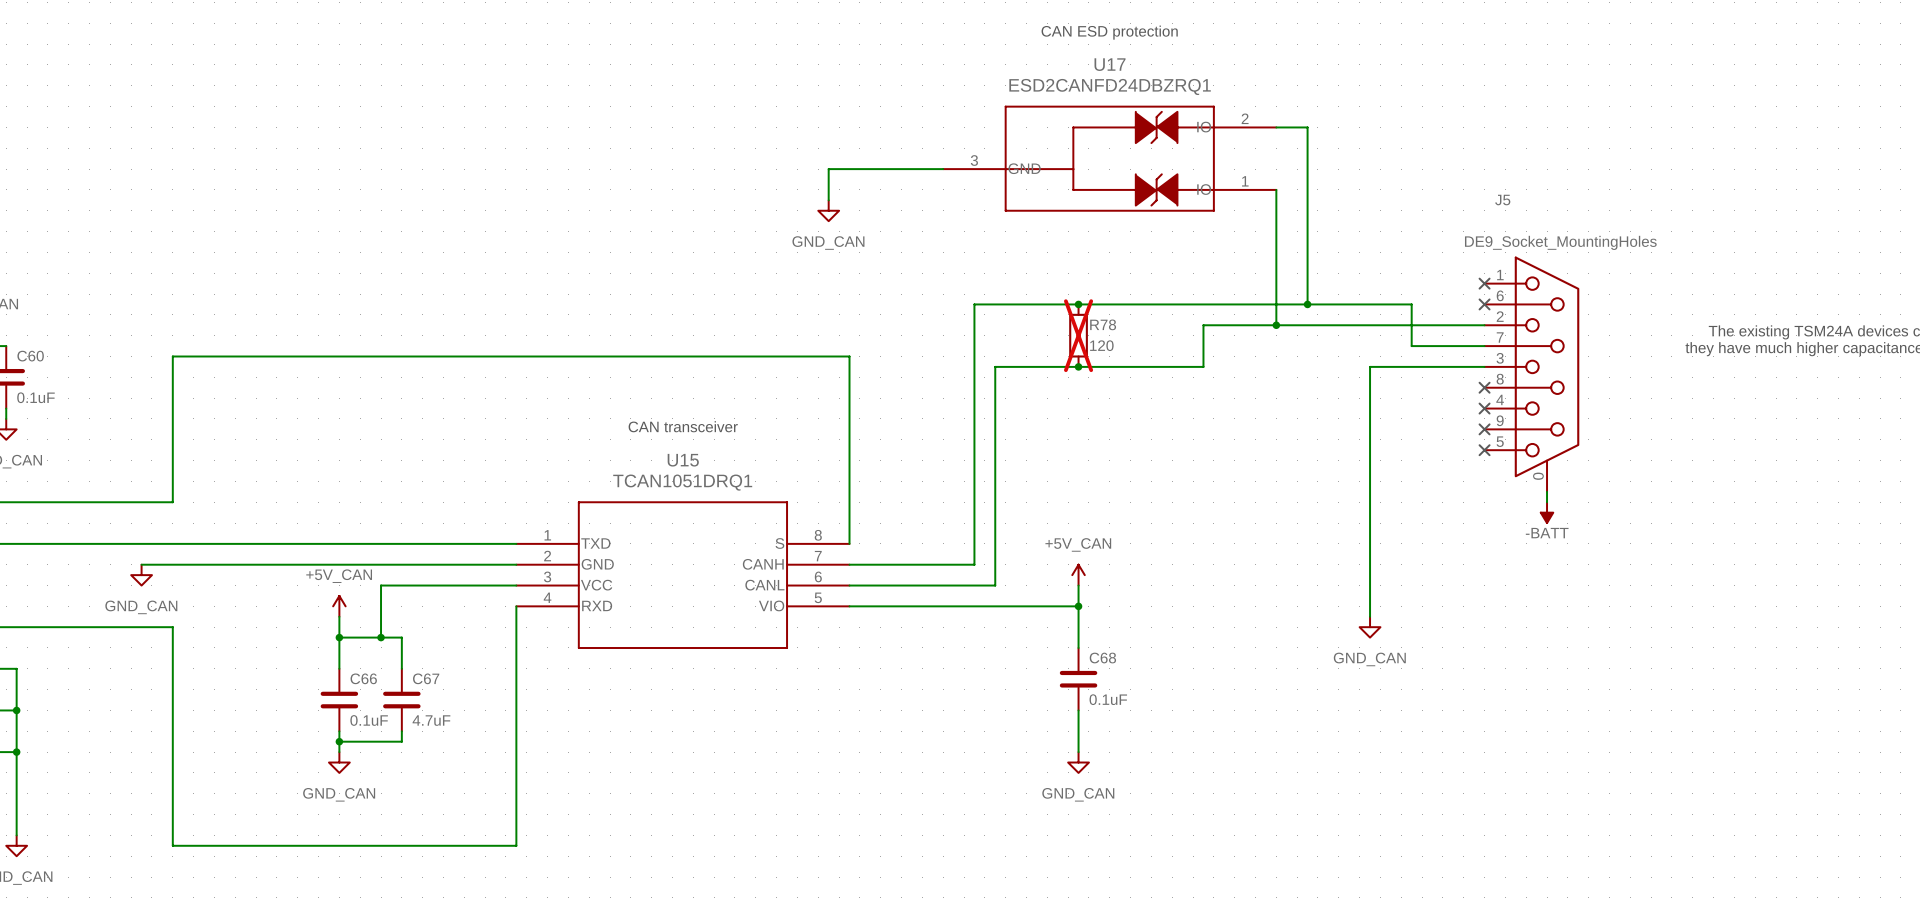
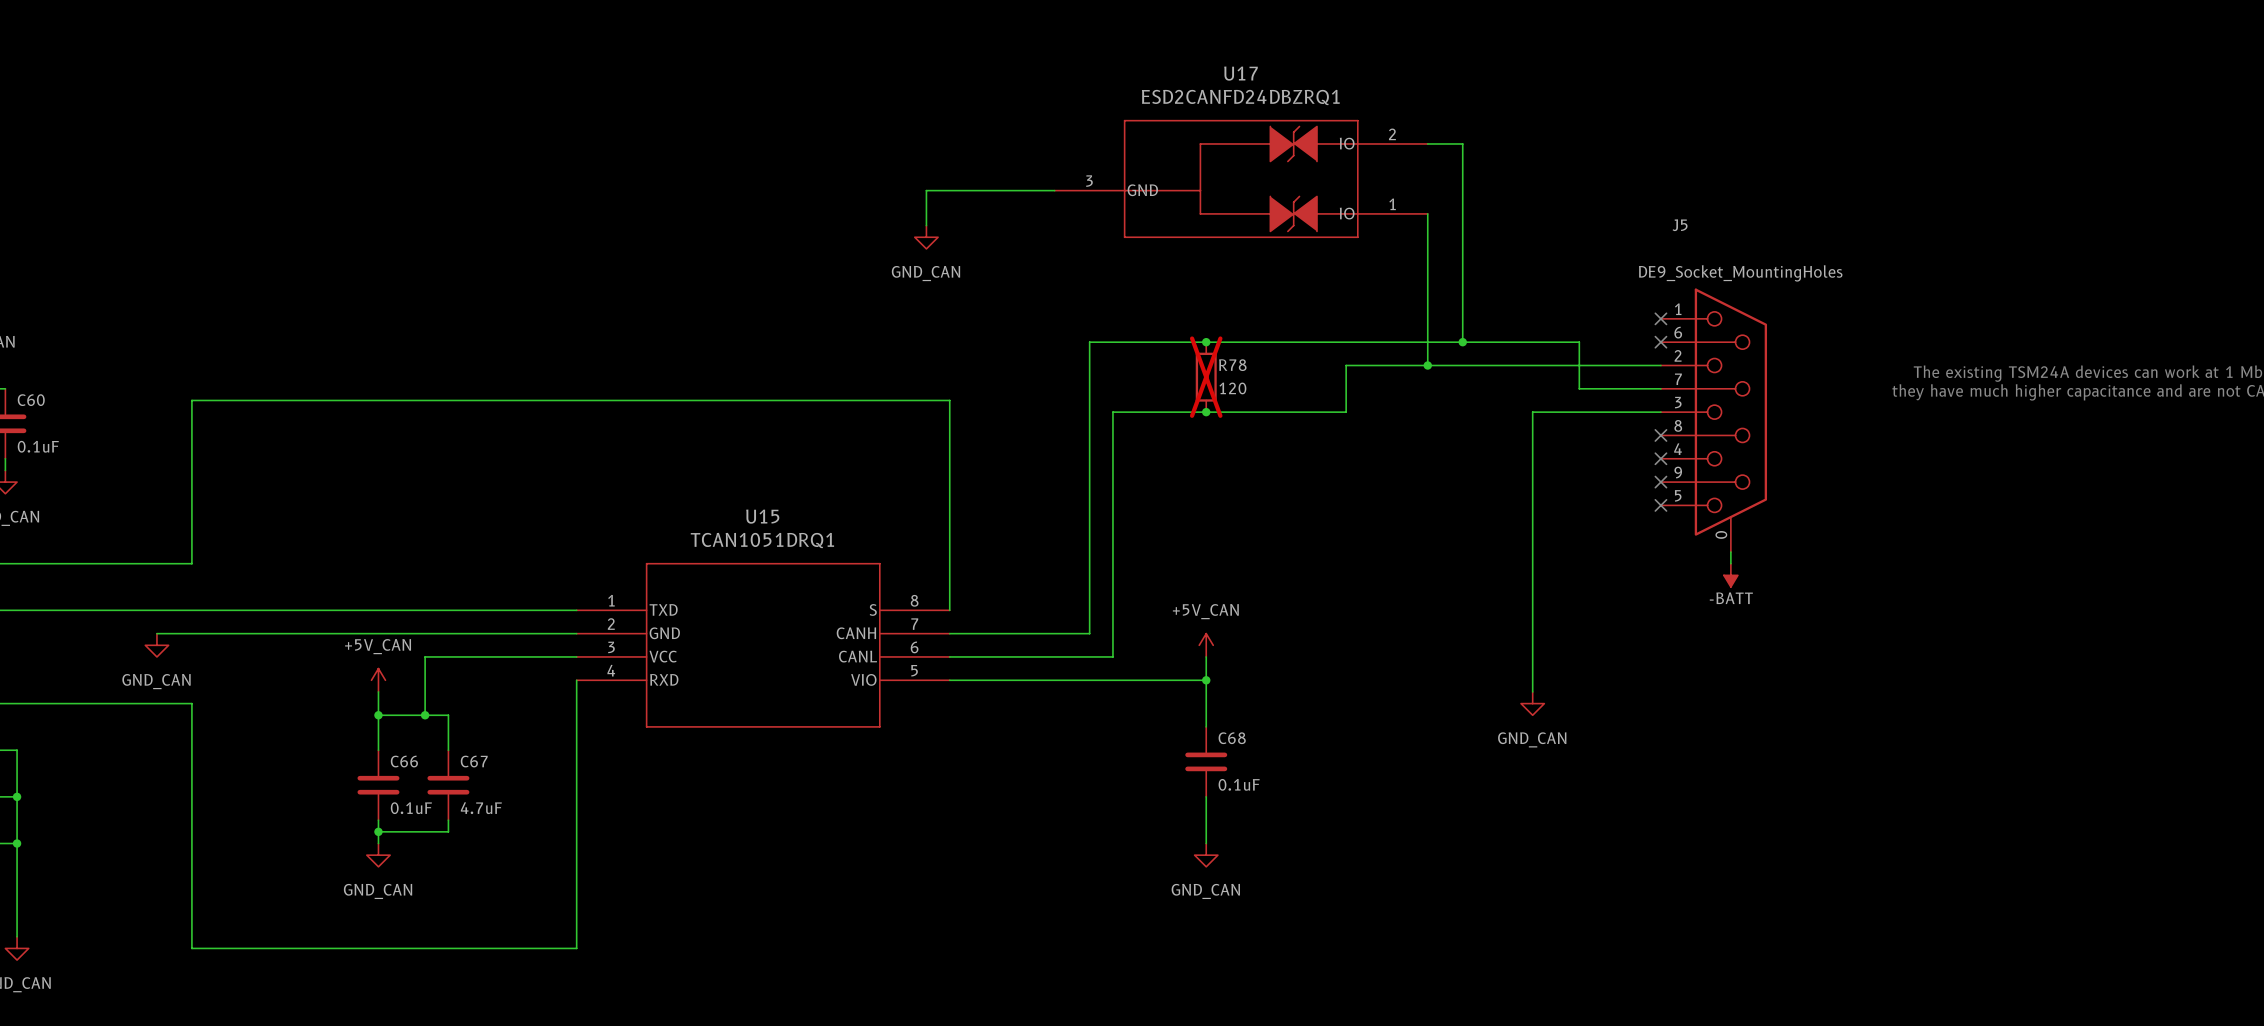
text: CAN ESD protection (1109, 32) -> none
text: CAN transceiver (683, 426) -> none

